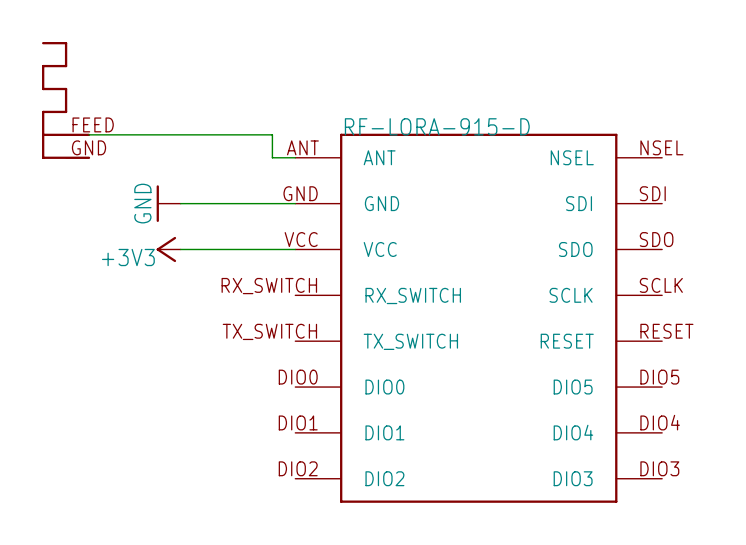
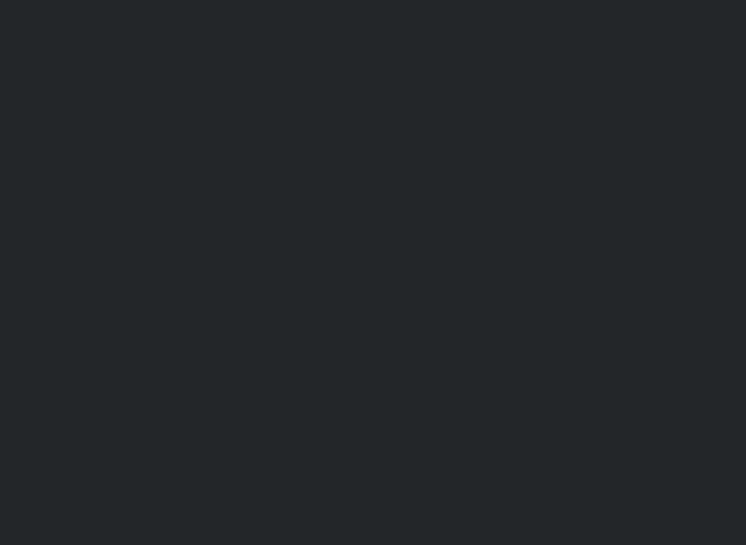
part: (66, 100) -> none
wire: (89, 134) (272, 134) (272, 157) (295, 157) -> none
power symbol: GND (168, 203) -> none
wire: (180, 203) (295, 203) -> none
power symbol: +3V3 (168, 249) -> none
wire: (180, 249) (295, 249) -> none
part: (478, 318) -> none

